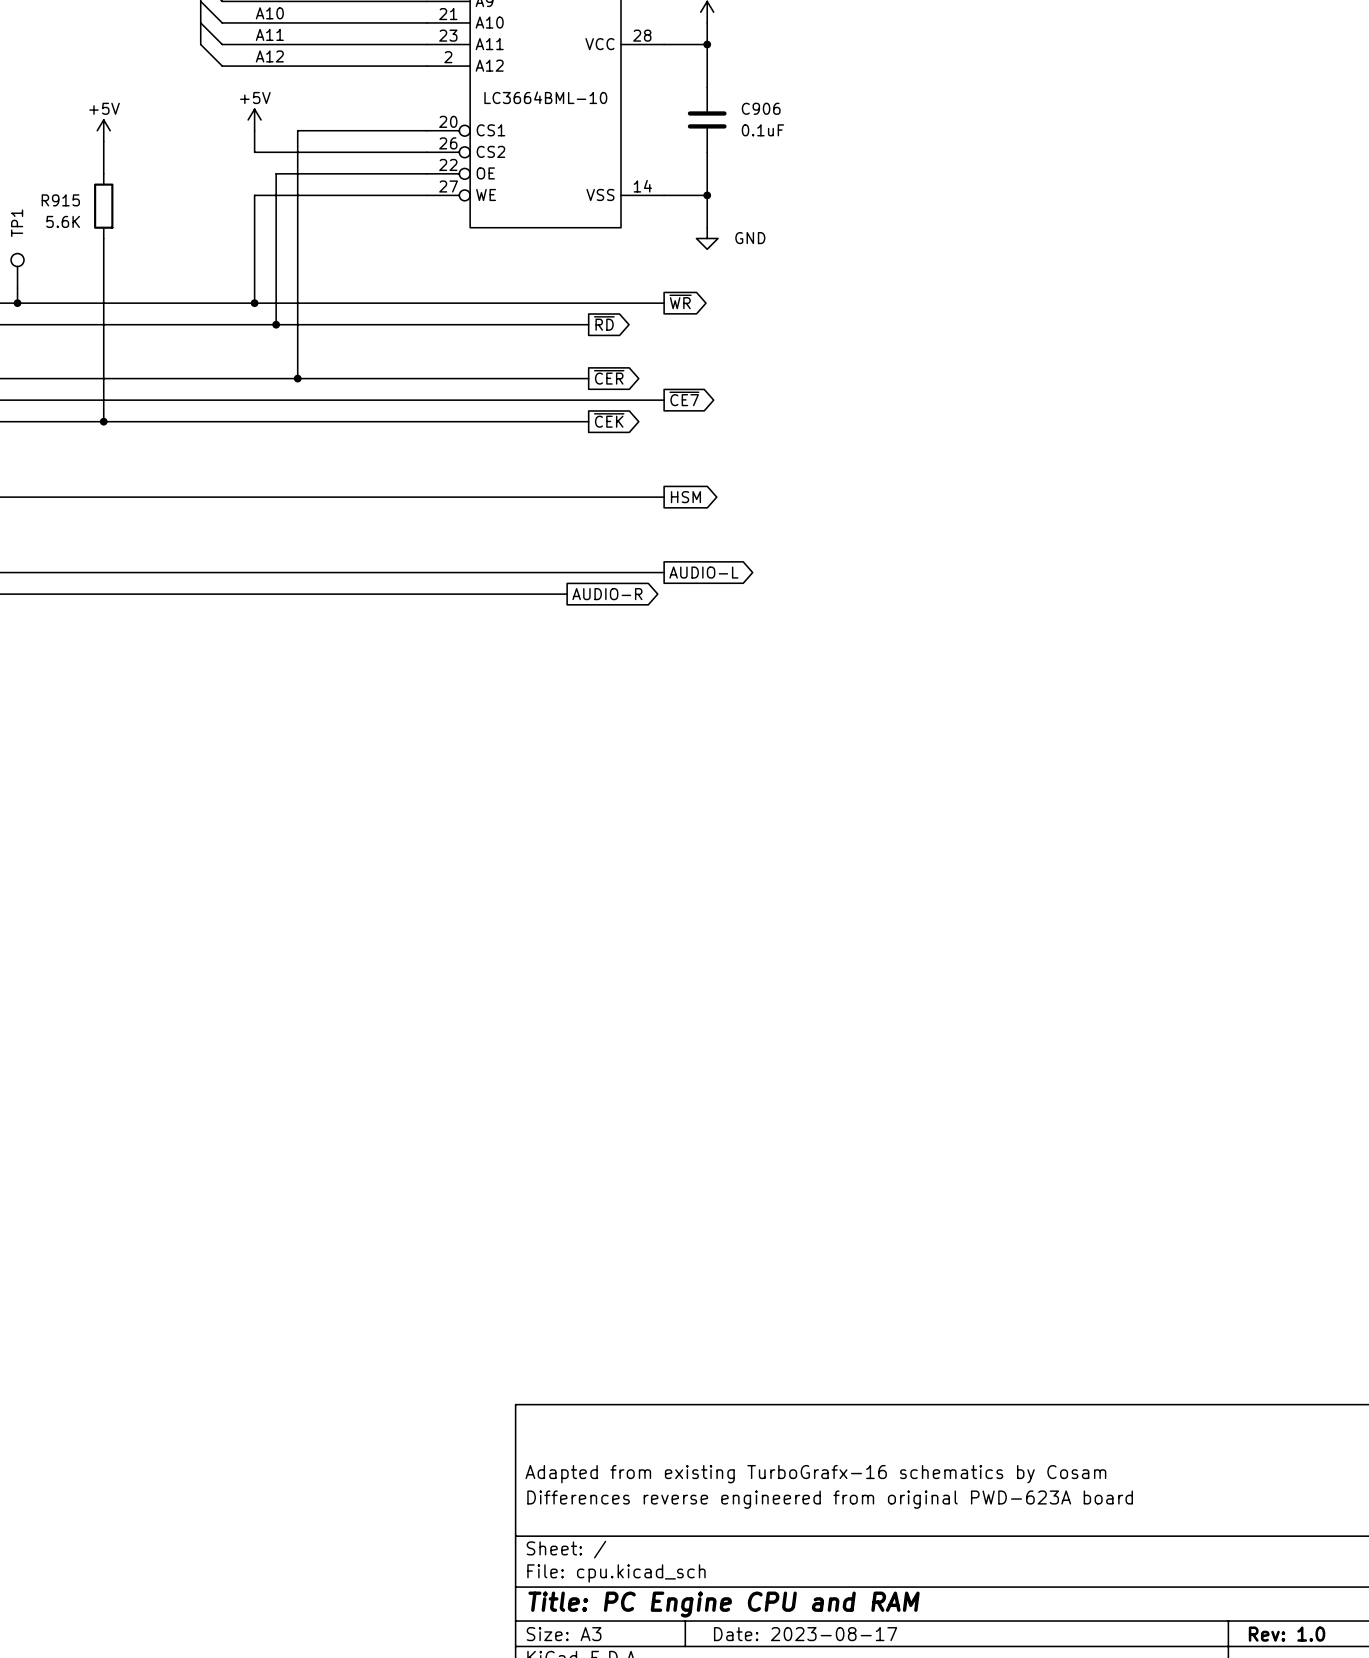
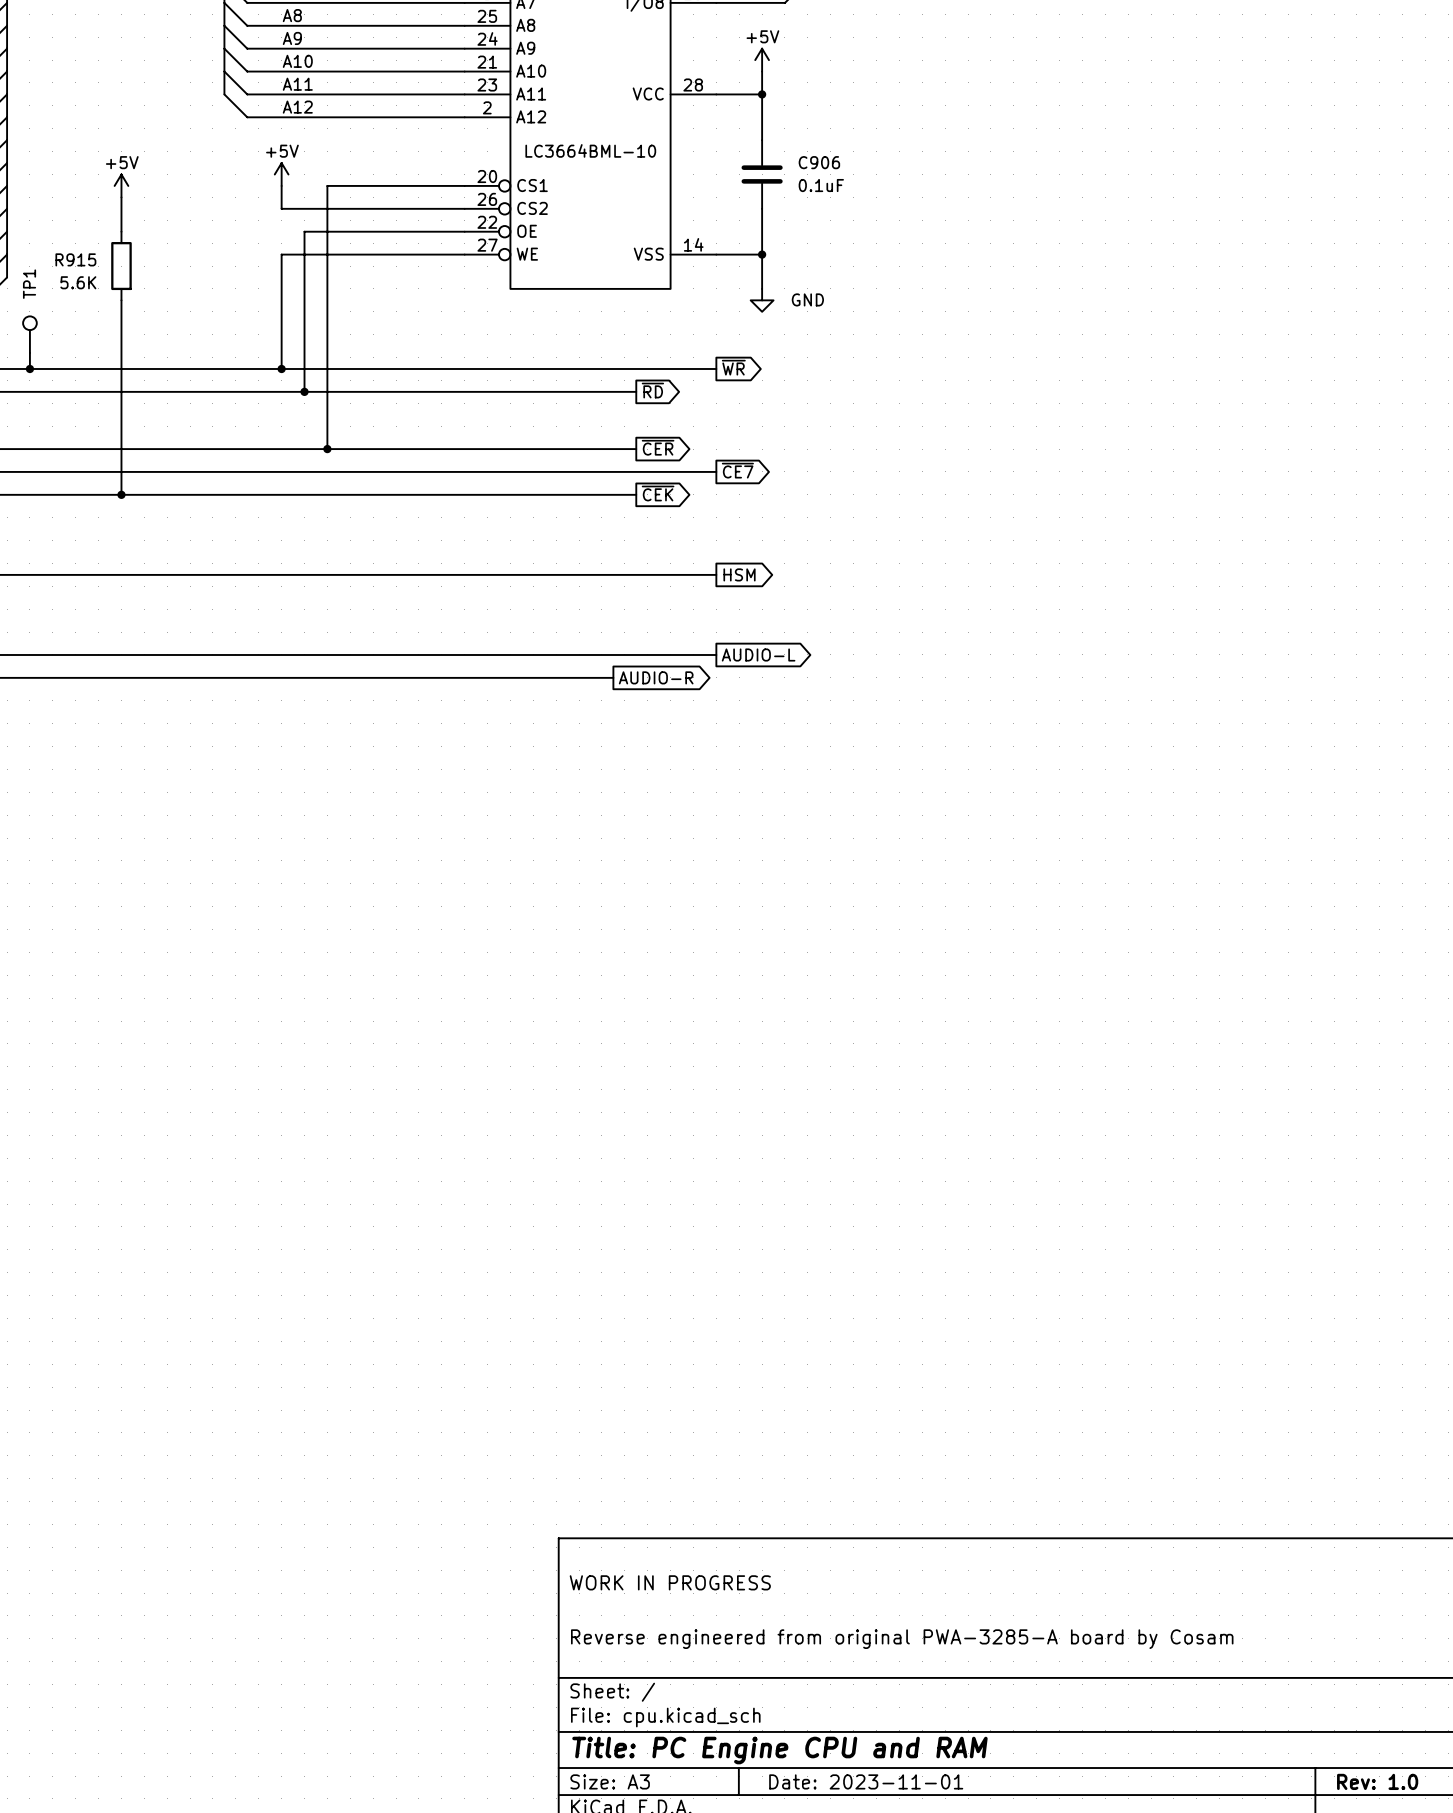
title block: none -> WORK IN PROGRESS (670, 1582)
title block: Adapted from existing TurboGrafx-16 schematics by Cosam (815, 1474) -> none
title block: Differences reverse engineered from original PWD-623A board (830, 1499) -> Reverse engineered from original PWA-3285-A board by Cosam (902, 1639)
title block: Date: 2023-08-17 (805, 1634) -> Date: 2023-11-01 (866, 1781)

